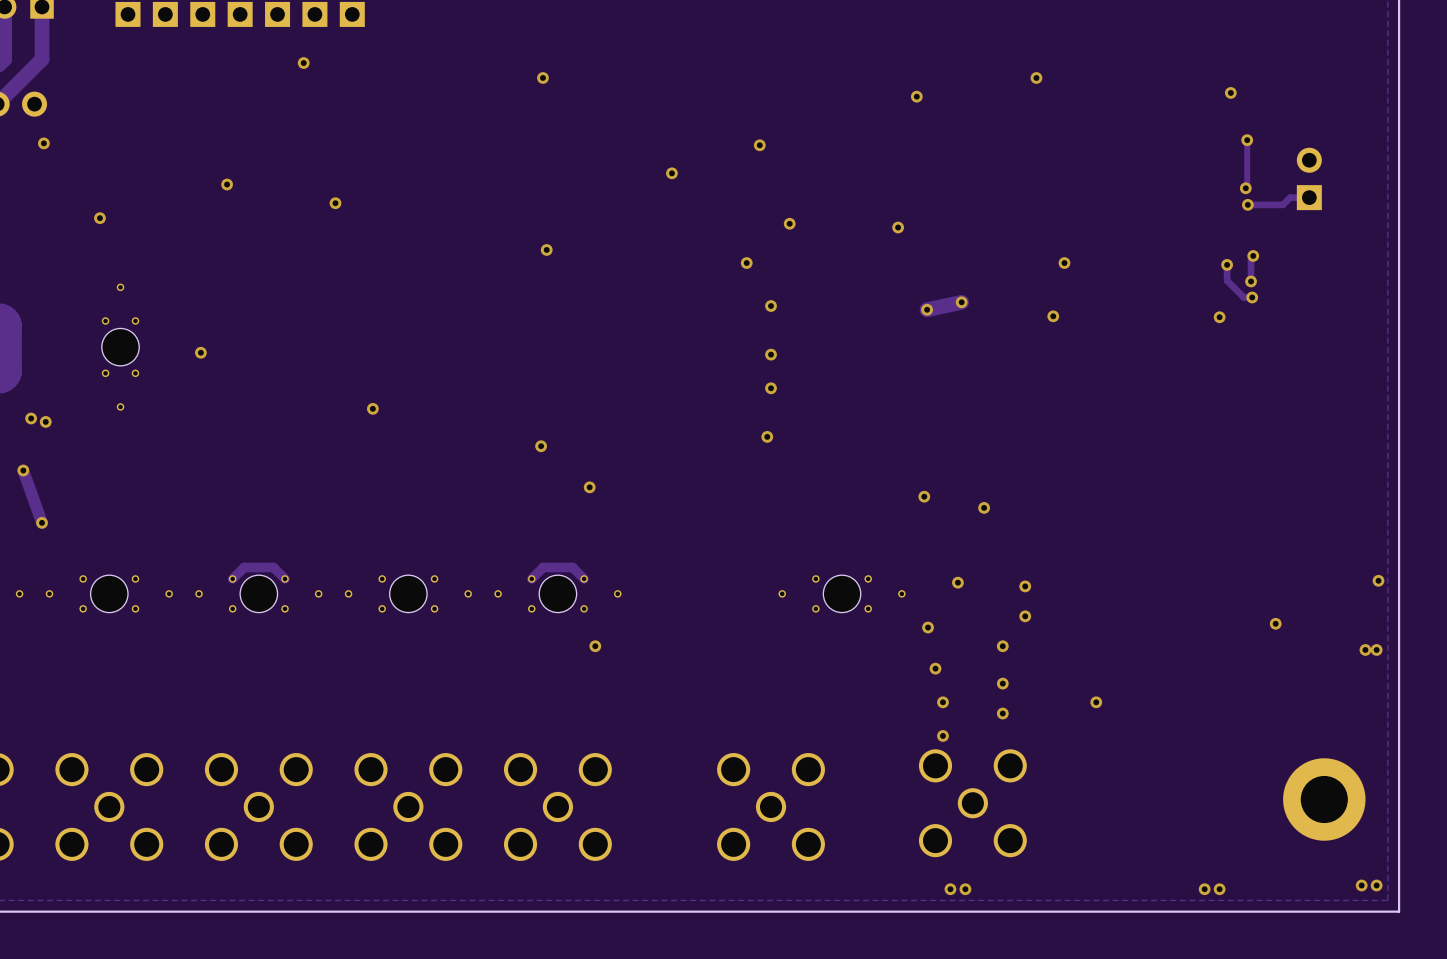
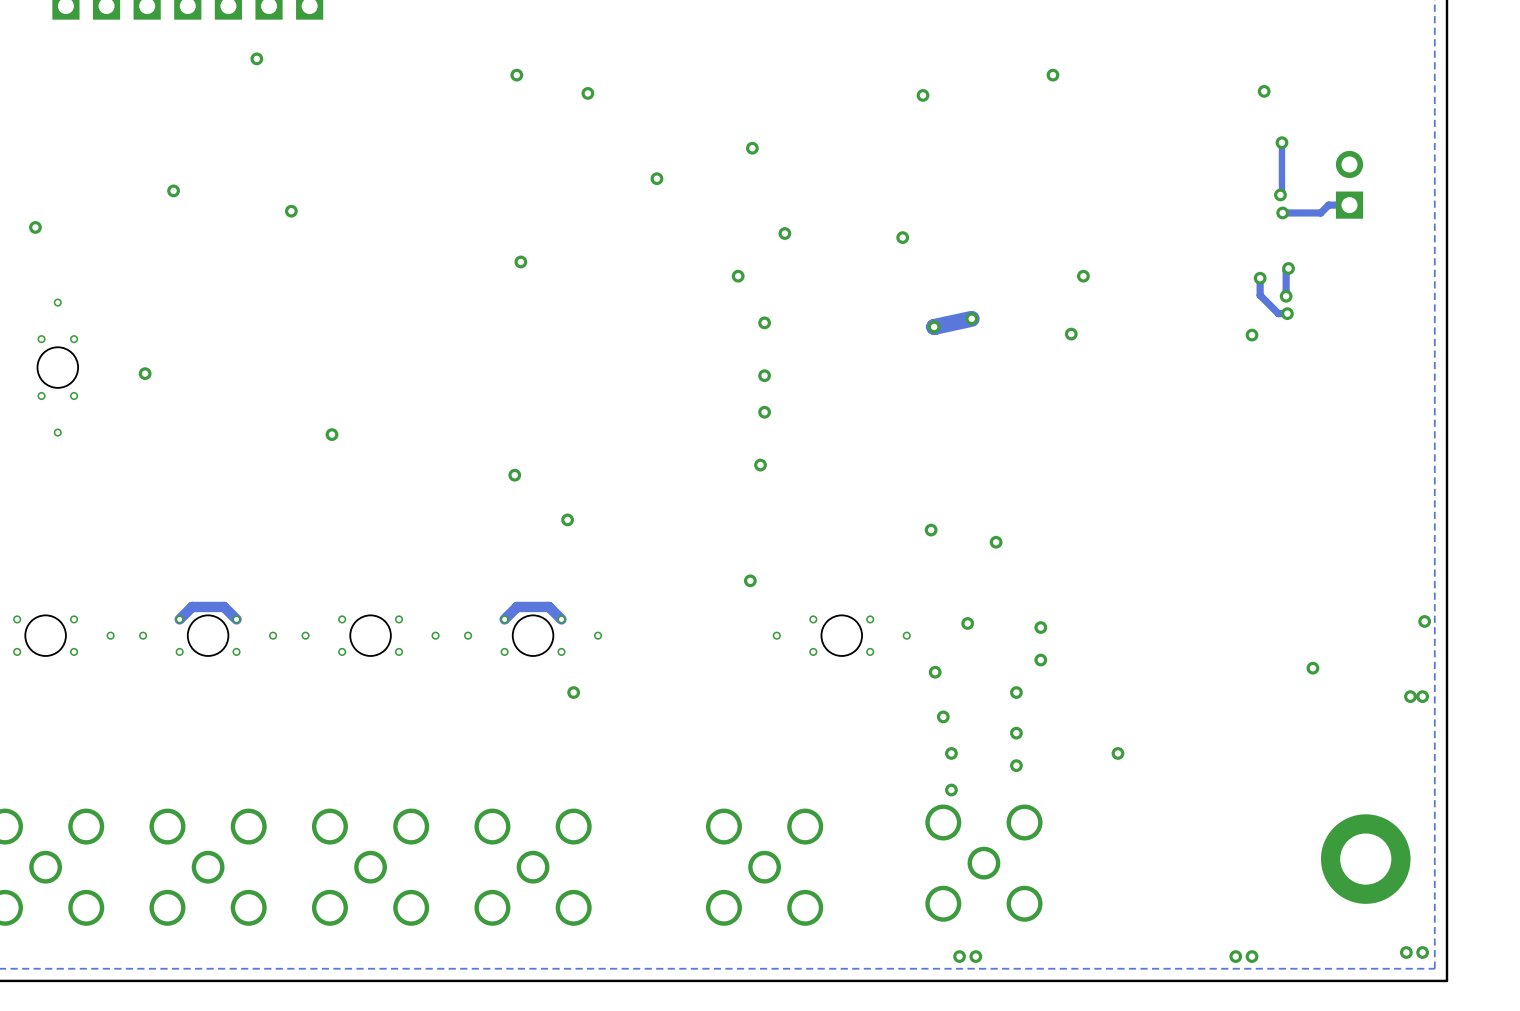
via: none -> (587, 93)
via: none -> (750, 580)

